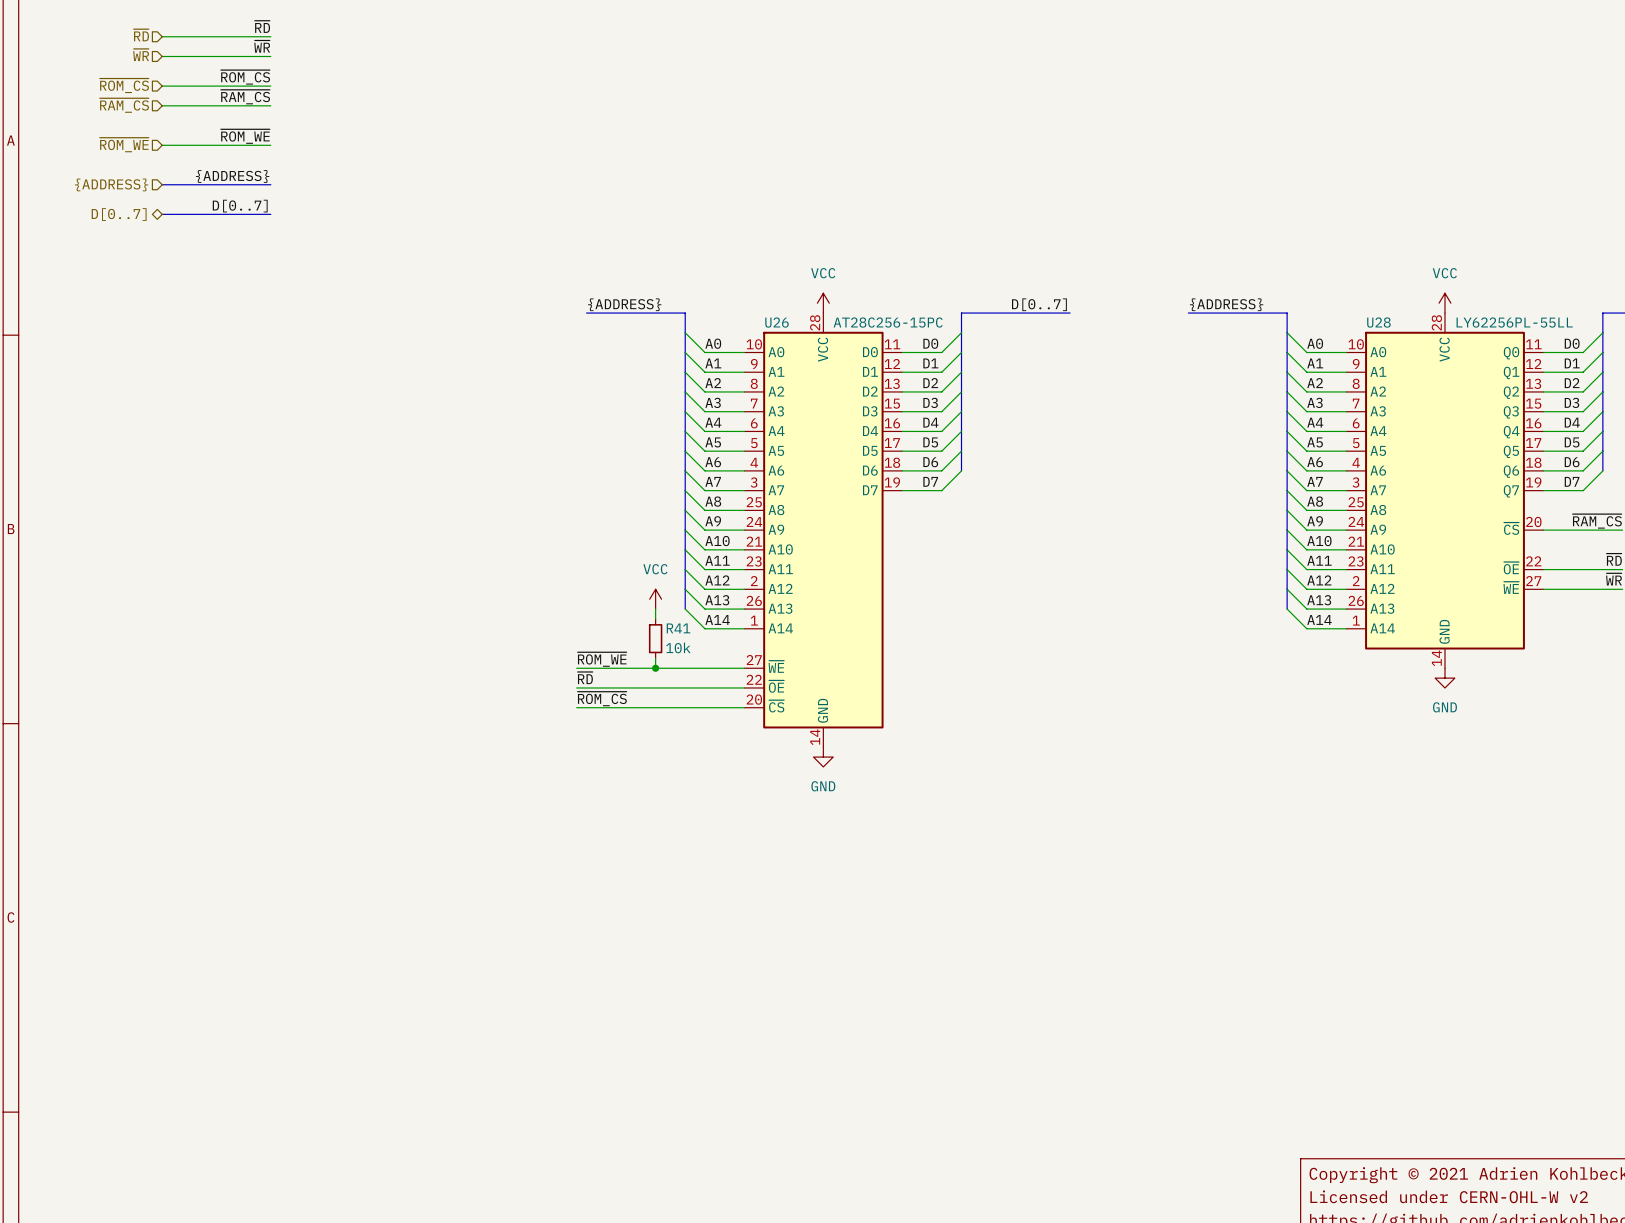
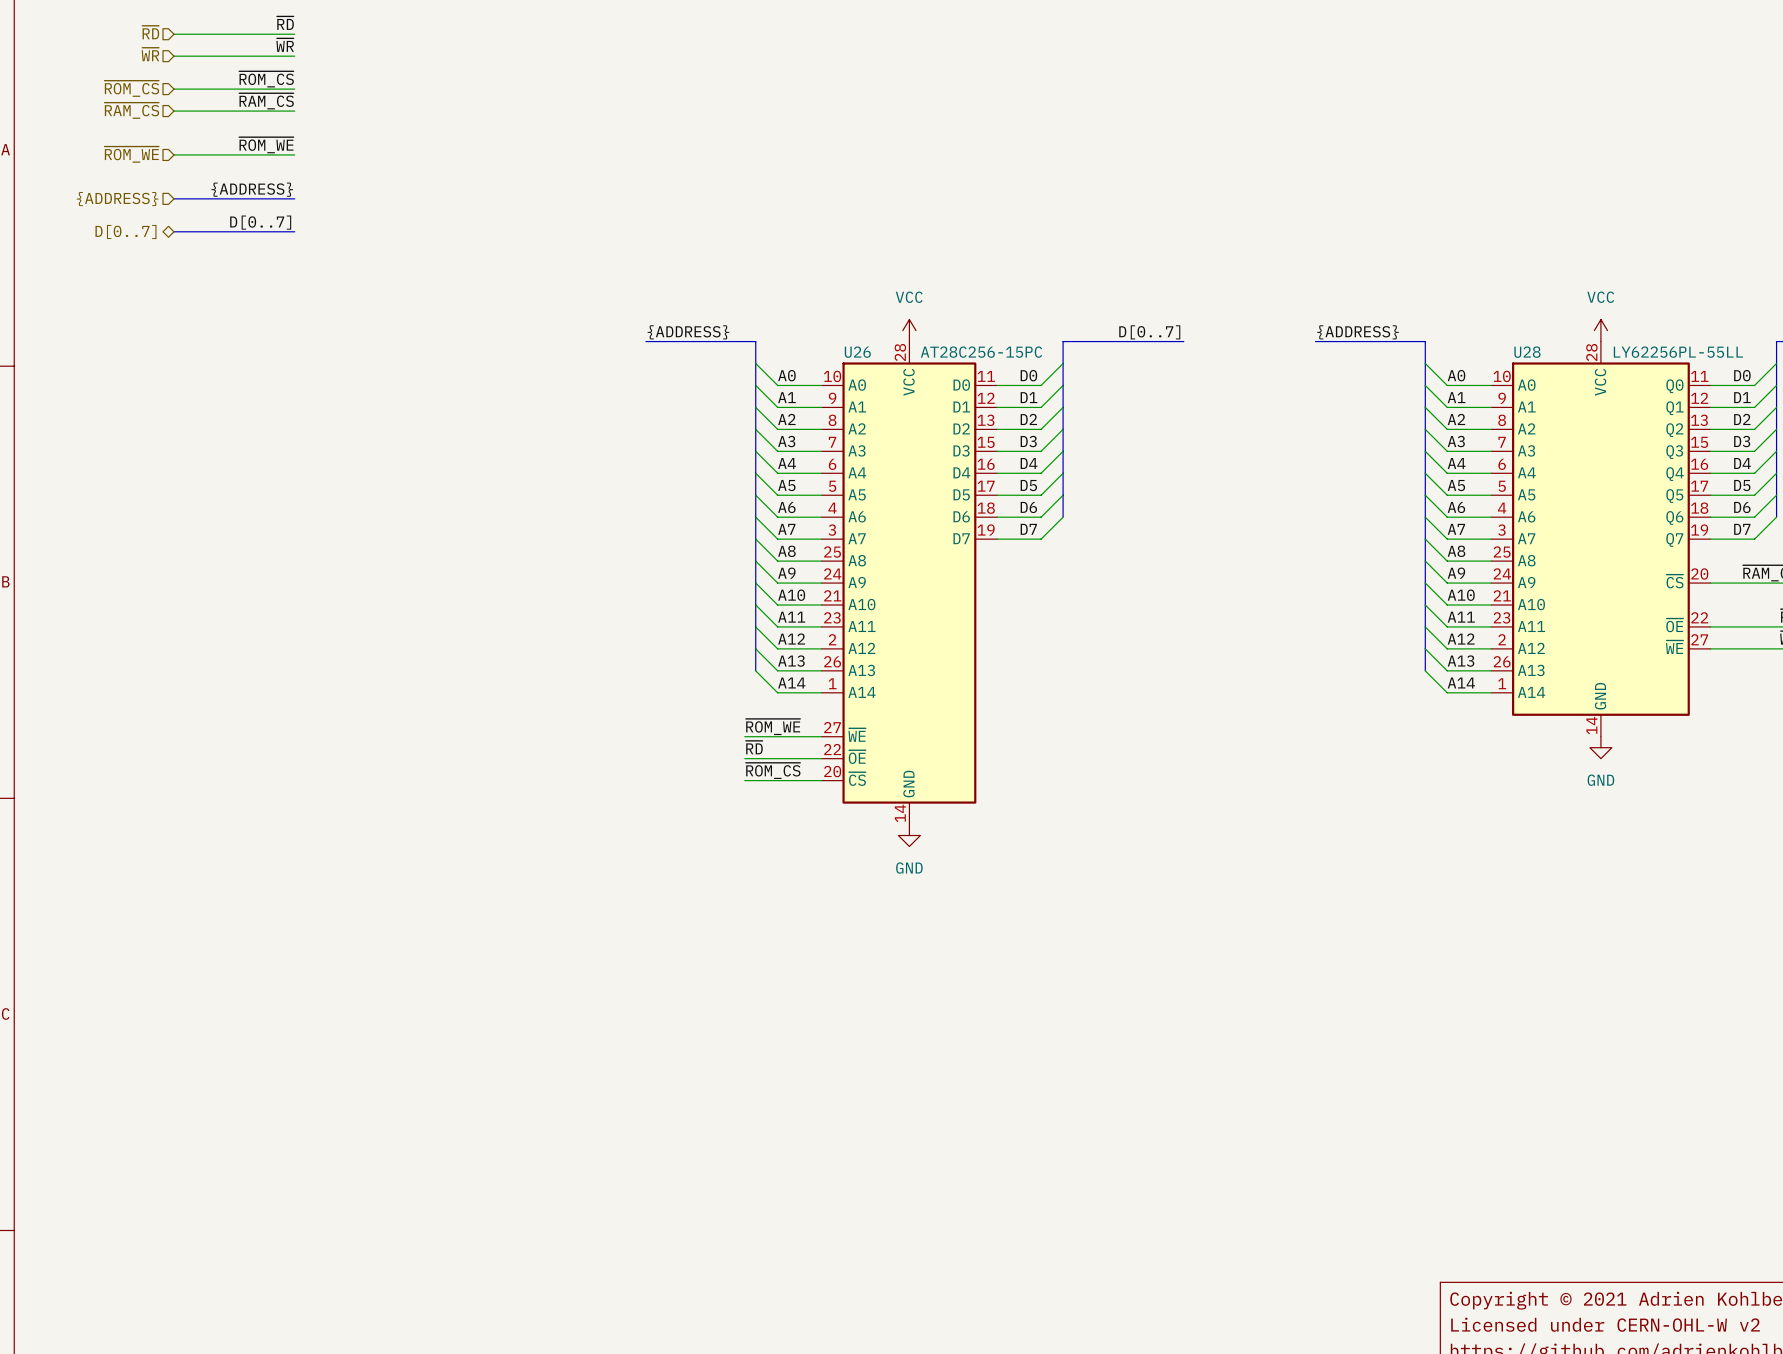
power symbol: VCC (655, 599) -> none
wire: (655, 609) (655, 618) -> none
R41: 10k (655, 638) -> none
wire: (655, 658) (655, 668) -> none
label position: ~{ROM_WE} (602, 659) -> ~{ROM_WE} (773, 726)
wire: (576, 668) (675, 668) -> none
junction: (655, 668) -> none
label position: ~{RD} (585, 678) -> ~{RD} (754, 747)
wire: (576, 687) (675, 687) -> none
label position: ~{ROM_CS} (602, 698) -> ~{ROM_CS} (773, 770)
wire: (576, 707) (675, 707) -> none

